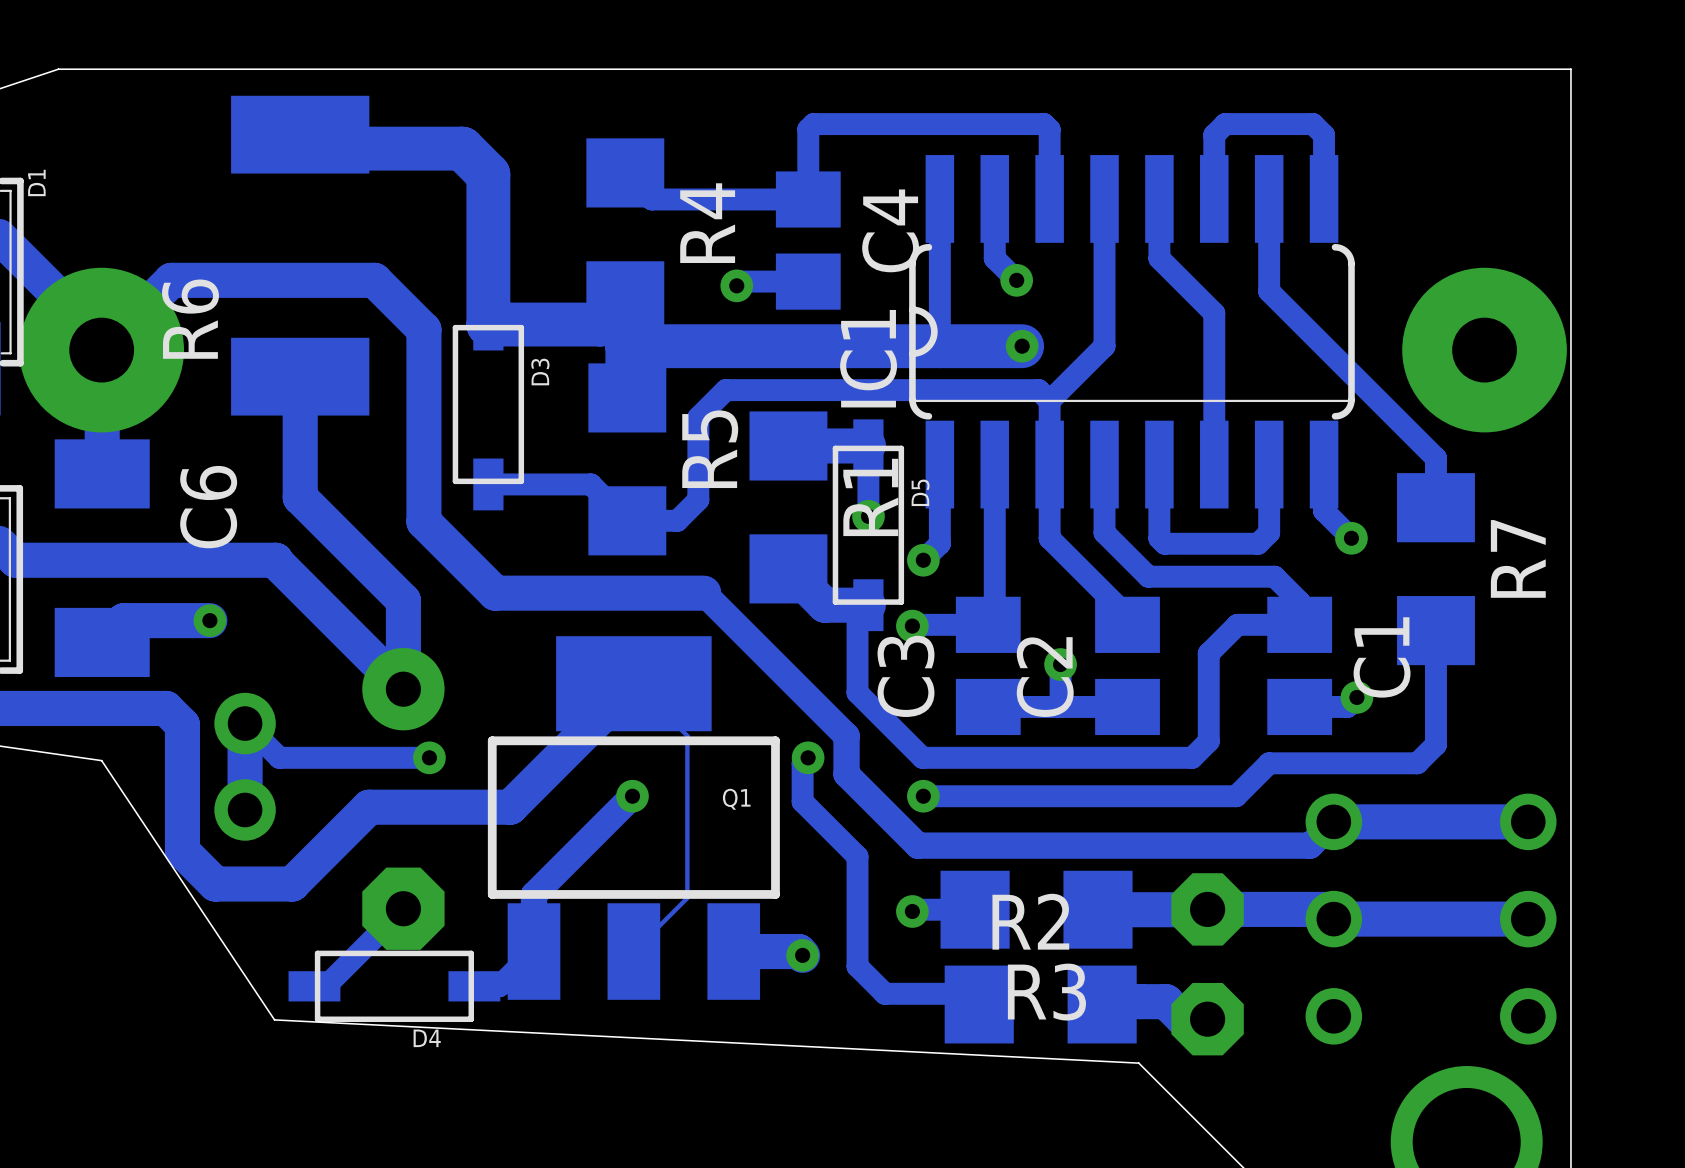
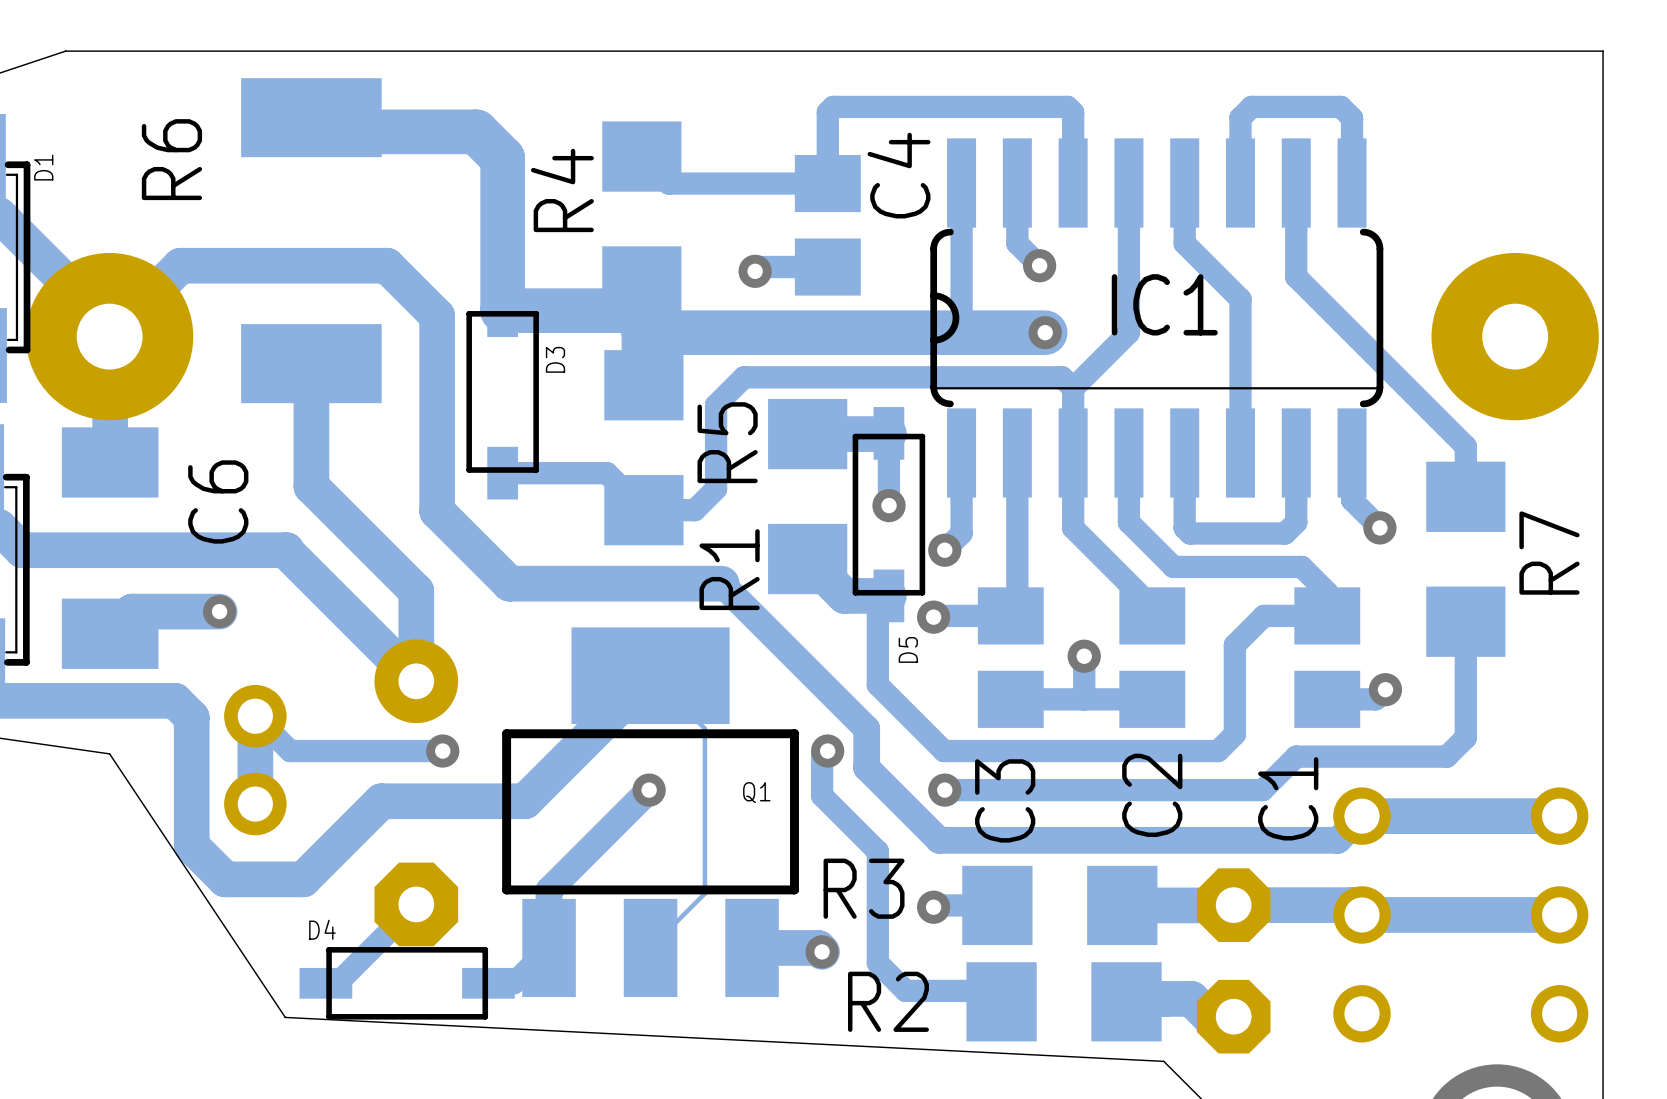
R4 name position: R4 (707, 223) -> R4 (562, 190)
C4 name position: C4 (890, 230) -> C4 (899, 175)
R6 name position: R6 (190, 319) -> R6 (171, 159)
IC1 name rotation: 0° (868, 358) -> 90° clockwise (1164, 304)
IC1 name position: IC1 (868, 358) -> IC1 (1164, 304)
D5 name position: D5 (920, 492) -> D5 (908, 649)
R1 name position: R1 (870, 497) -> R1 (729, 569)
C1 name position: C1 (1382, 657) -> C1 (1288, 798)
C3 name position: C3 (905, 676) -> C3 (1005, 800)
C2 name position: C2 (1045, 677) -> C2 (1152, 795)
R2 name position: R2 (1030, 921) -> R2 (888, 1001)
R3 name position: R3 (1046, 992) -> R3 (864, 888)
D4 name position: D4 (427, 1038) -> D4 (322, 929)

